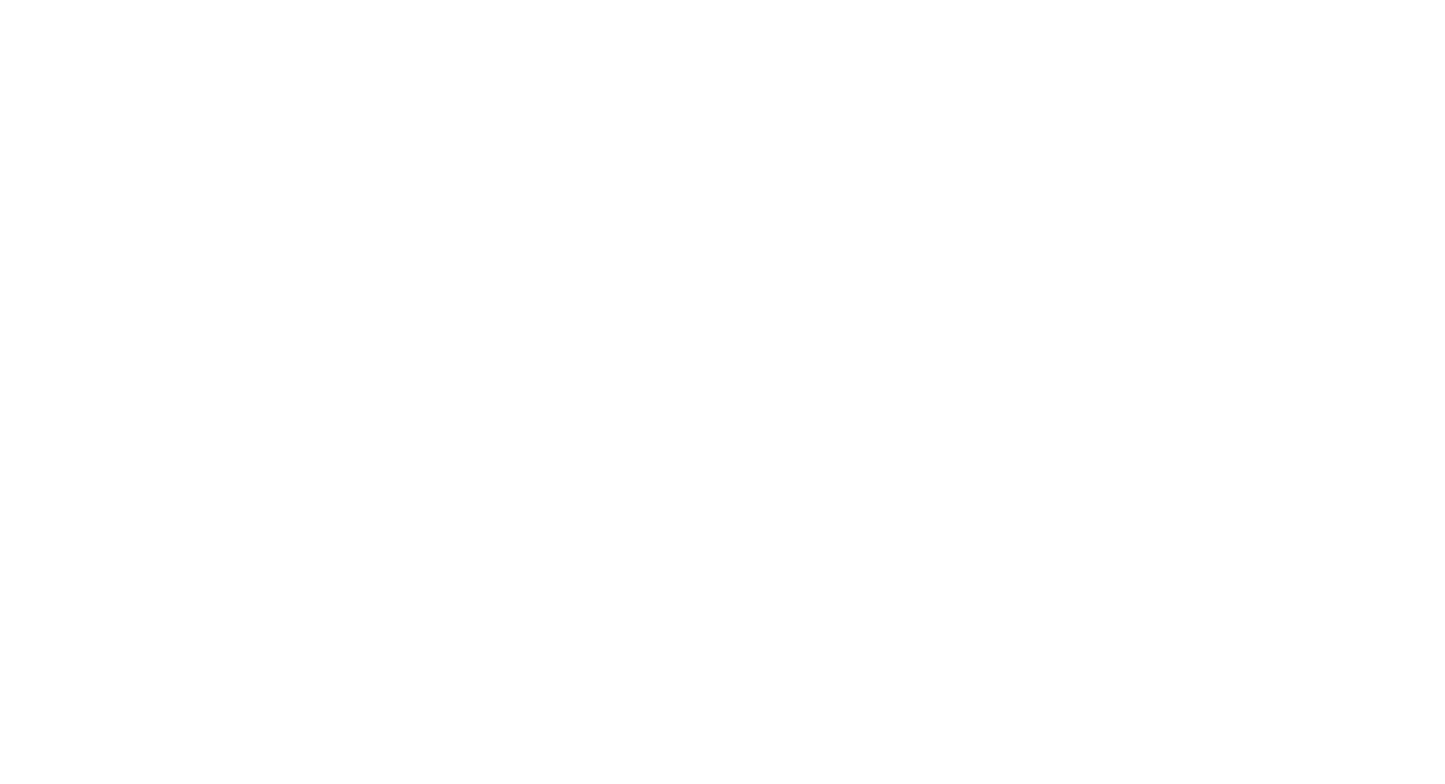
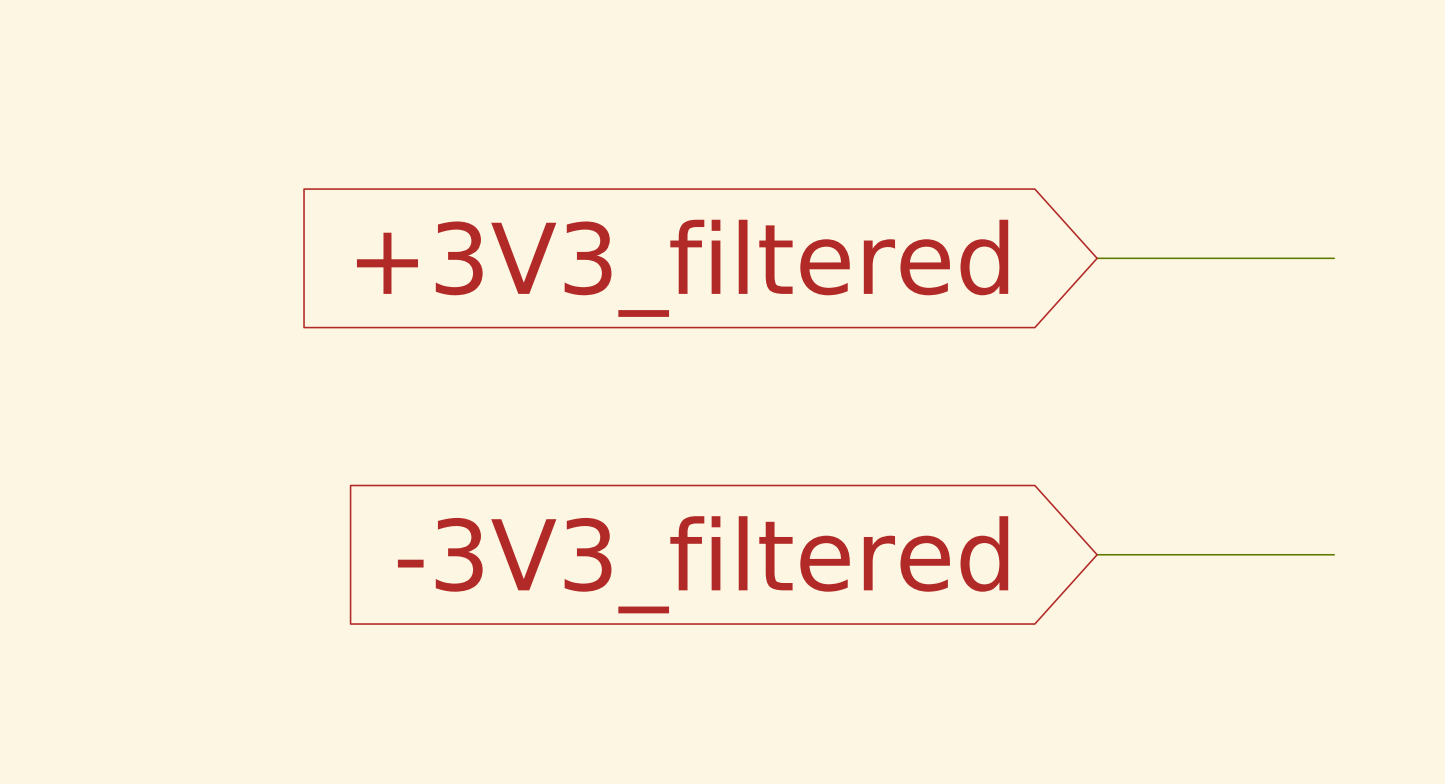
wire: none -> (1097, 258) (1334, 258)
global label: none -> +3V3_filtered (682, 268)
wire: none -> (1097, 554) (1334, 554)
global label: none -> -3V3_filtered (703, 564)

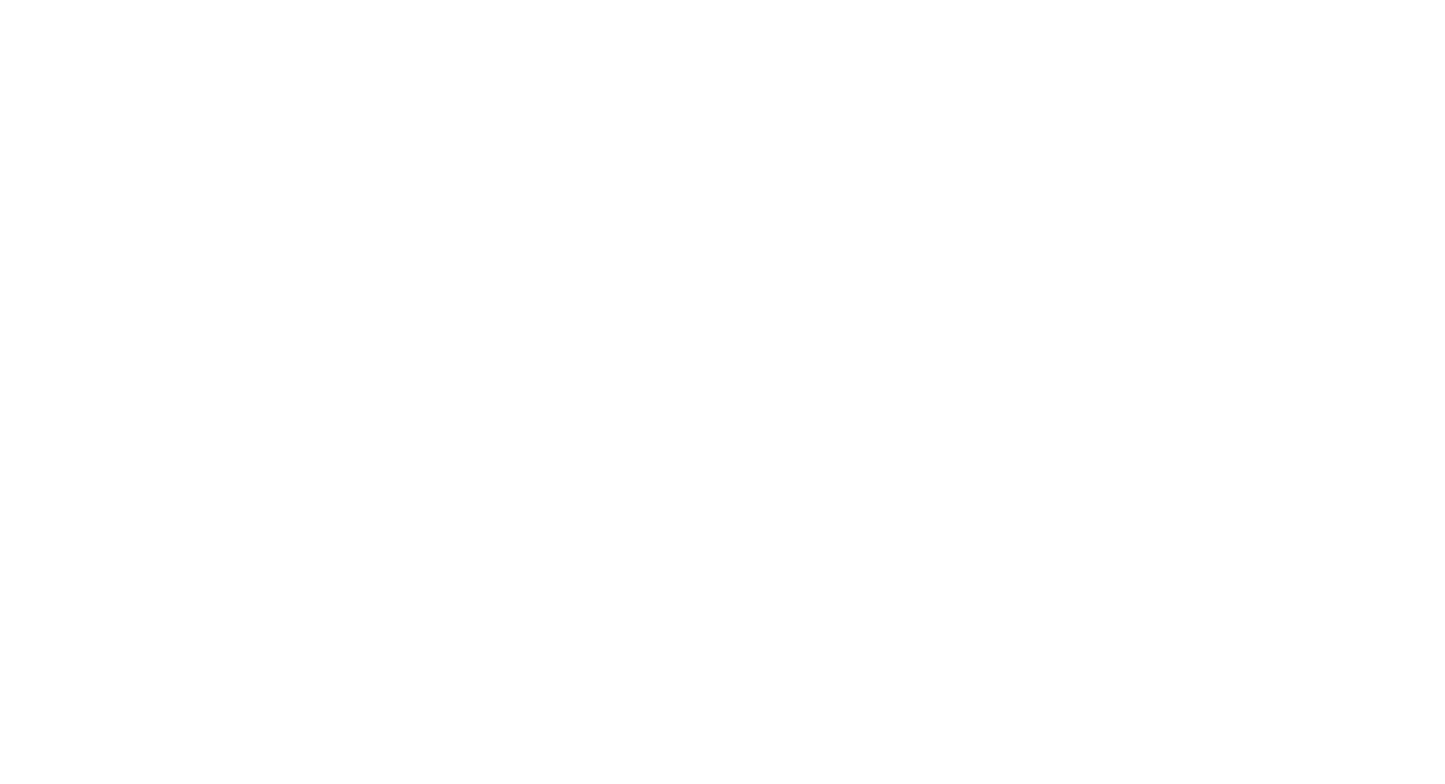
wire: (1097, 258) (1334, 258) -> none
global label: +3V3_filtered (682, 268) -> none
wire: (1097, 554) (1334, 554) -> none
global label: -3V3_filtered (703, 564) -> none

